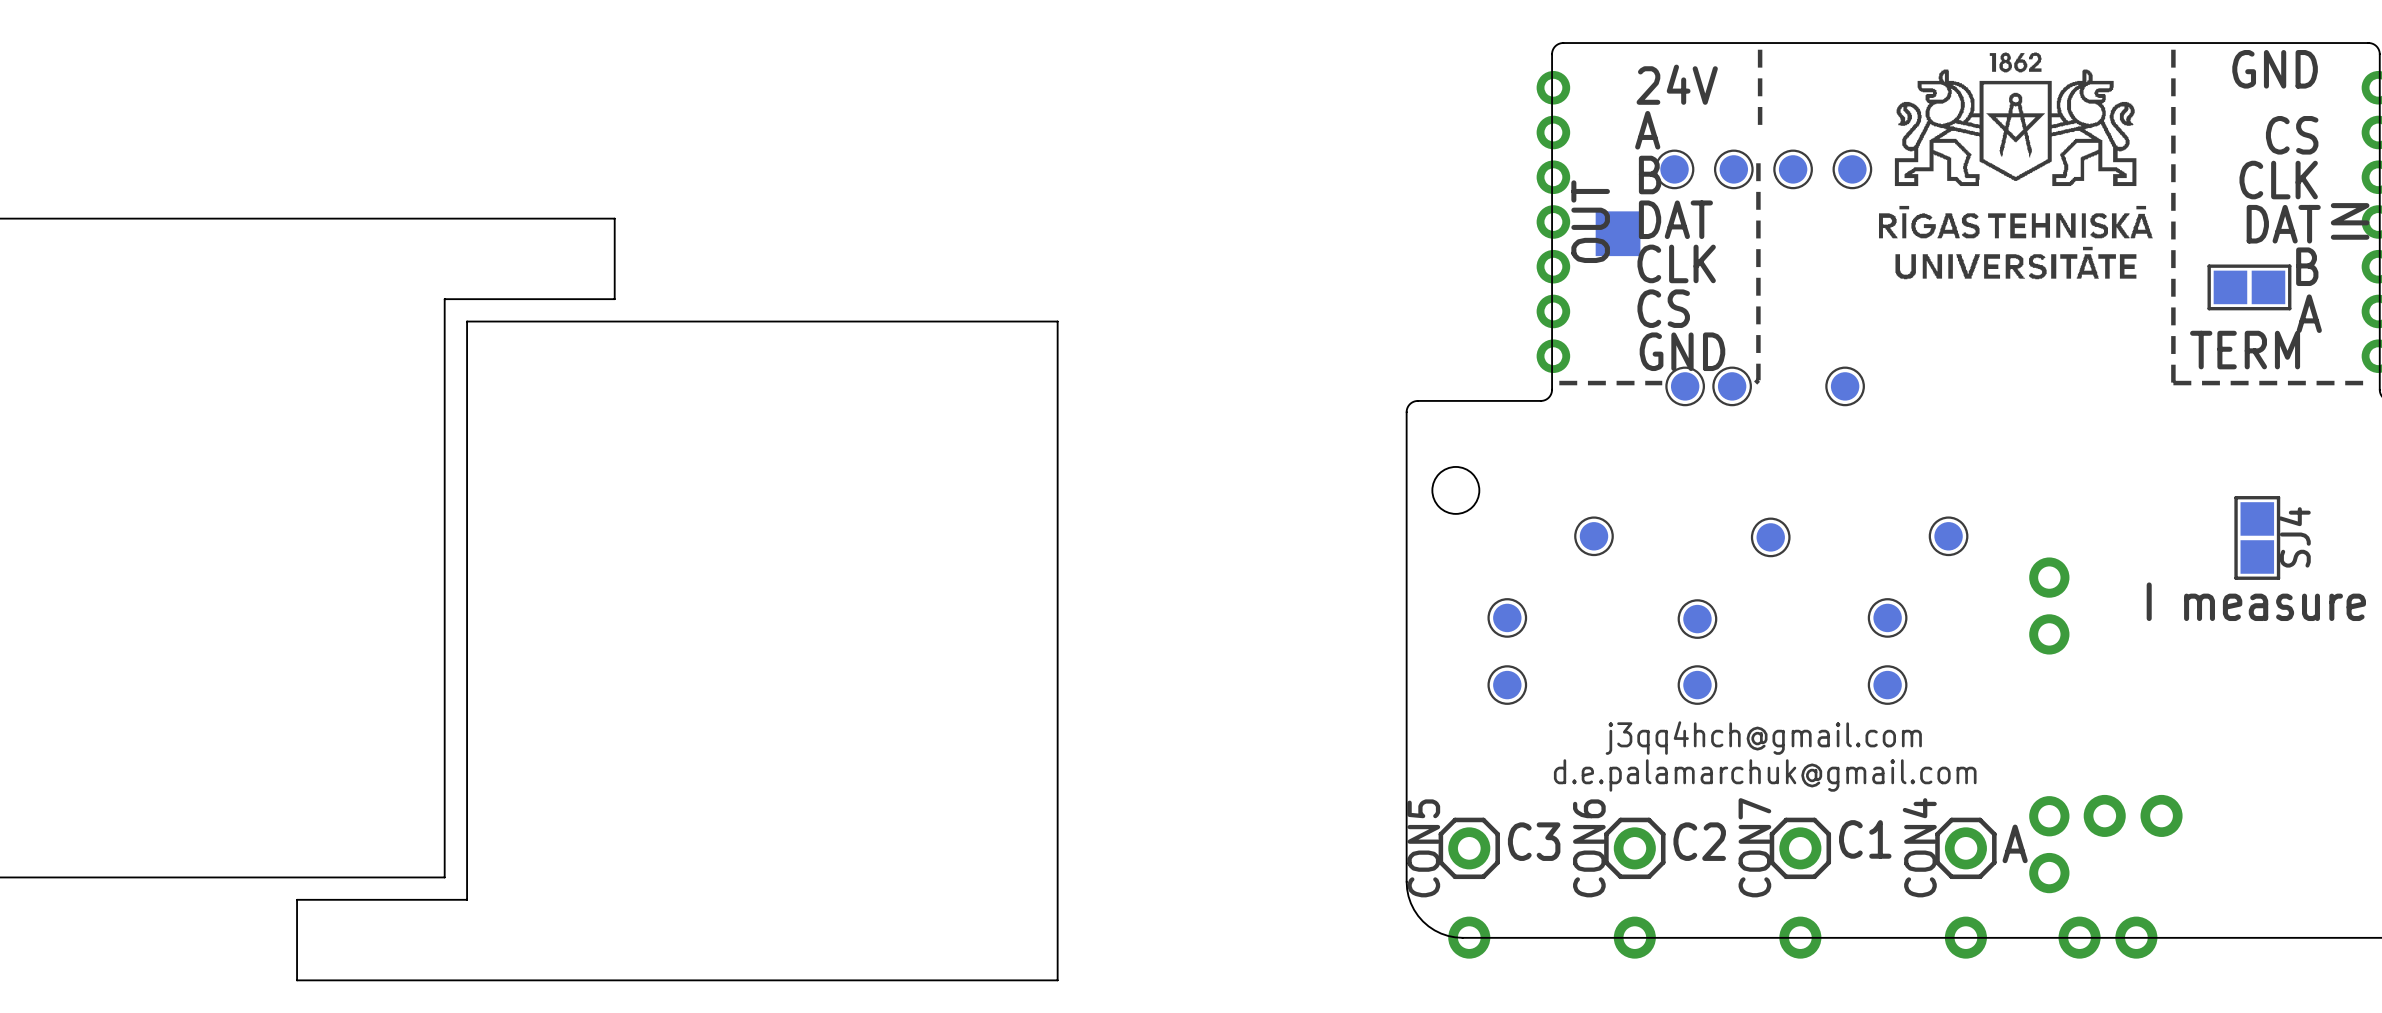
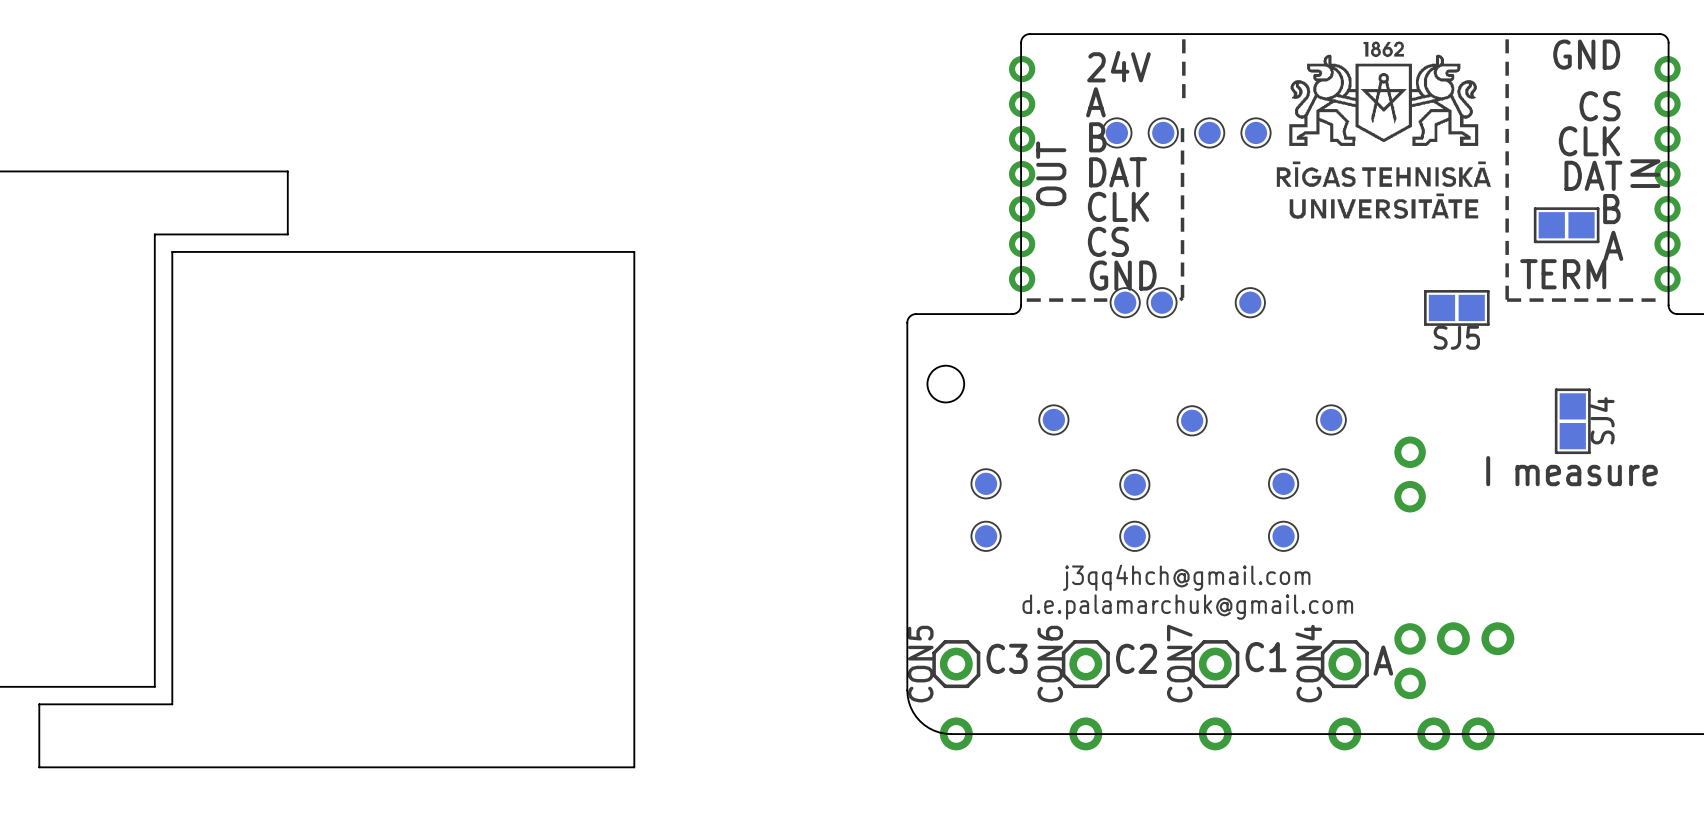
part: (1618, 222) -> none
part: (1618, 244) -> none
SJ5: none -> (1456, 307)

